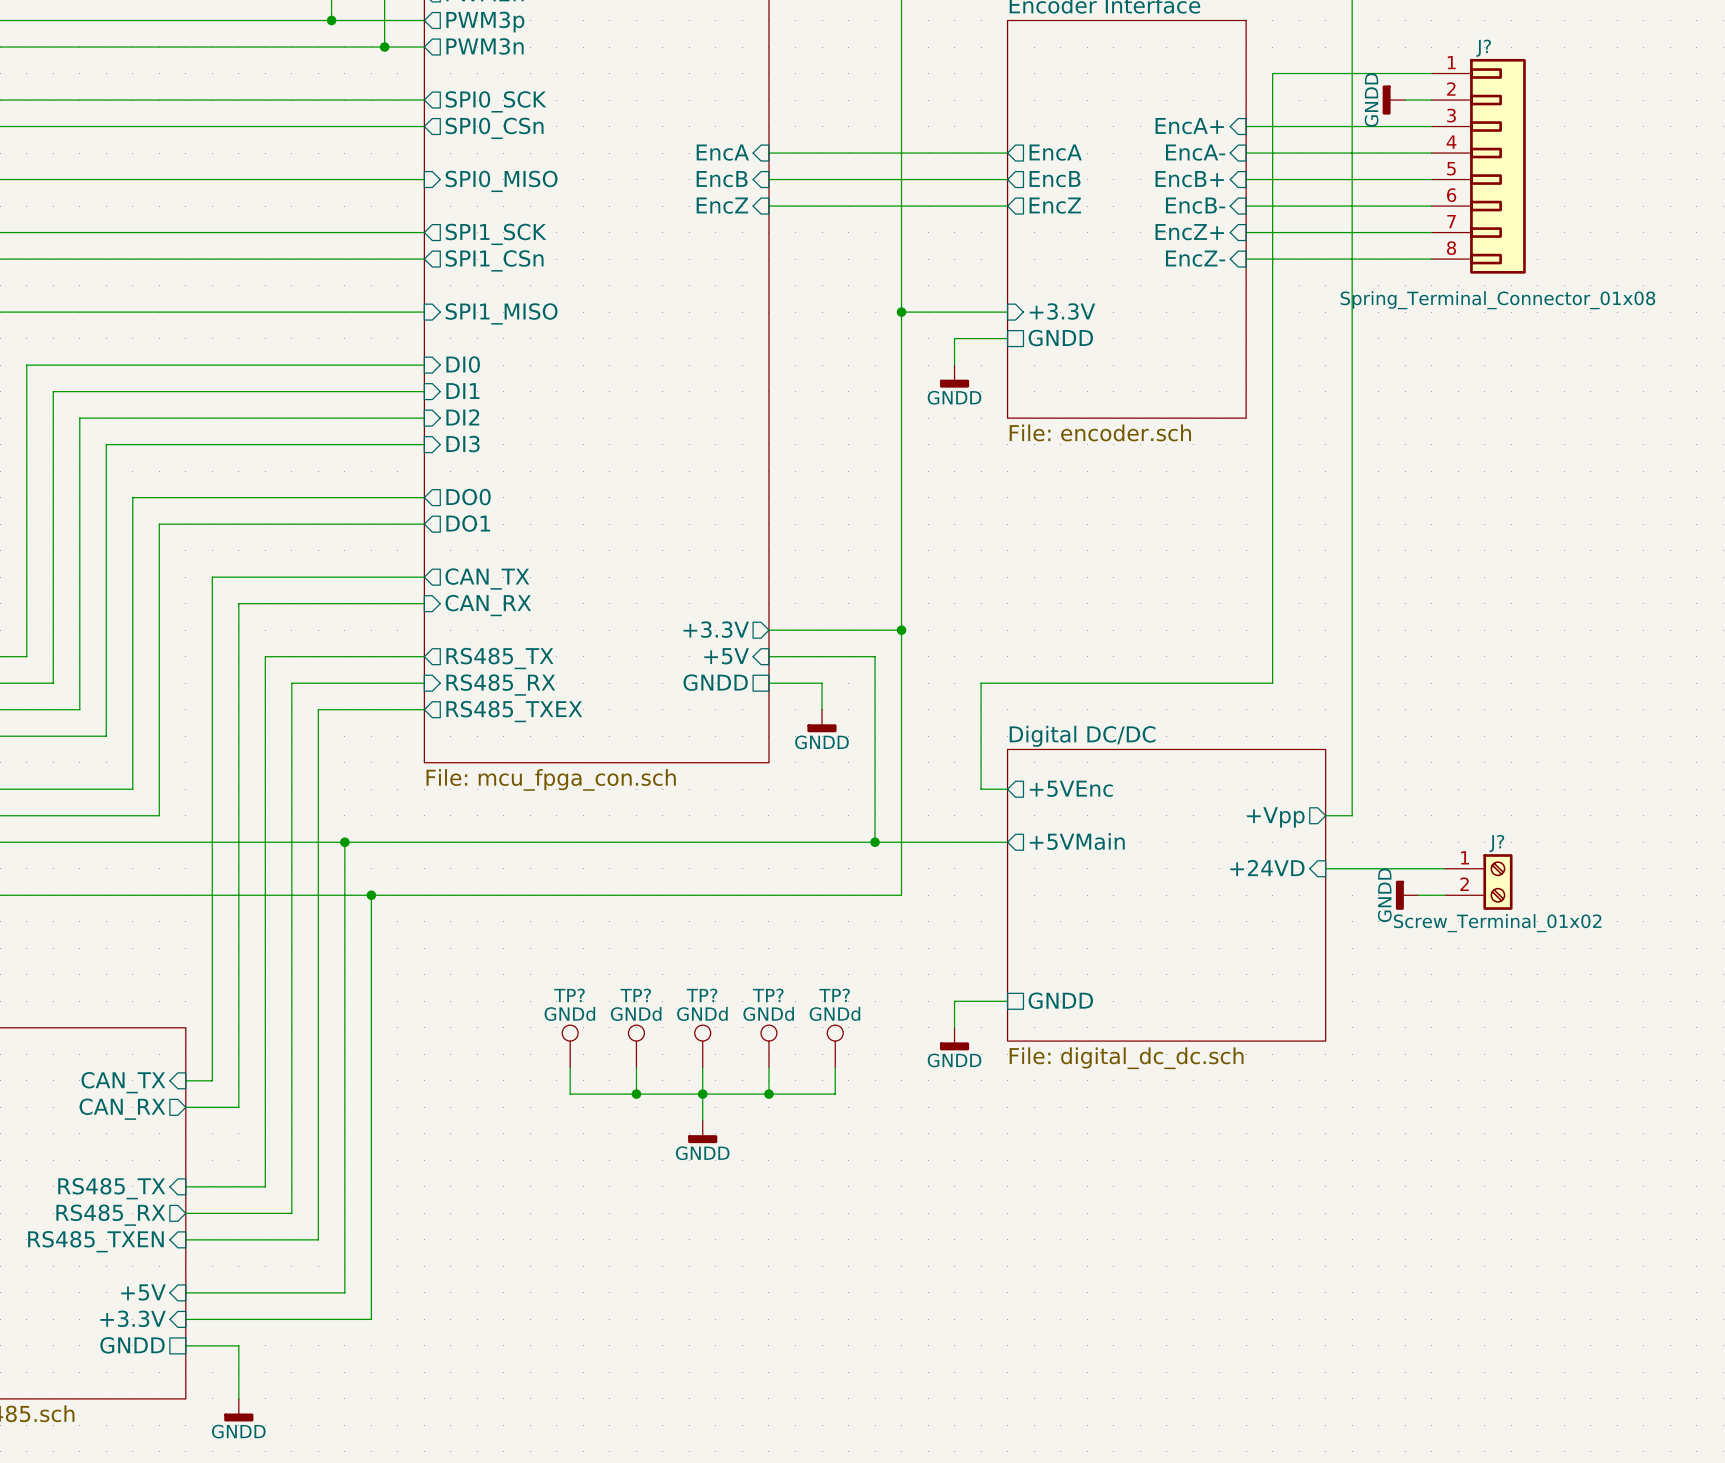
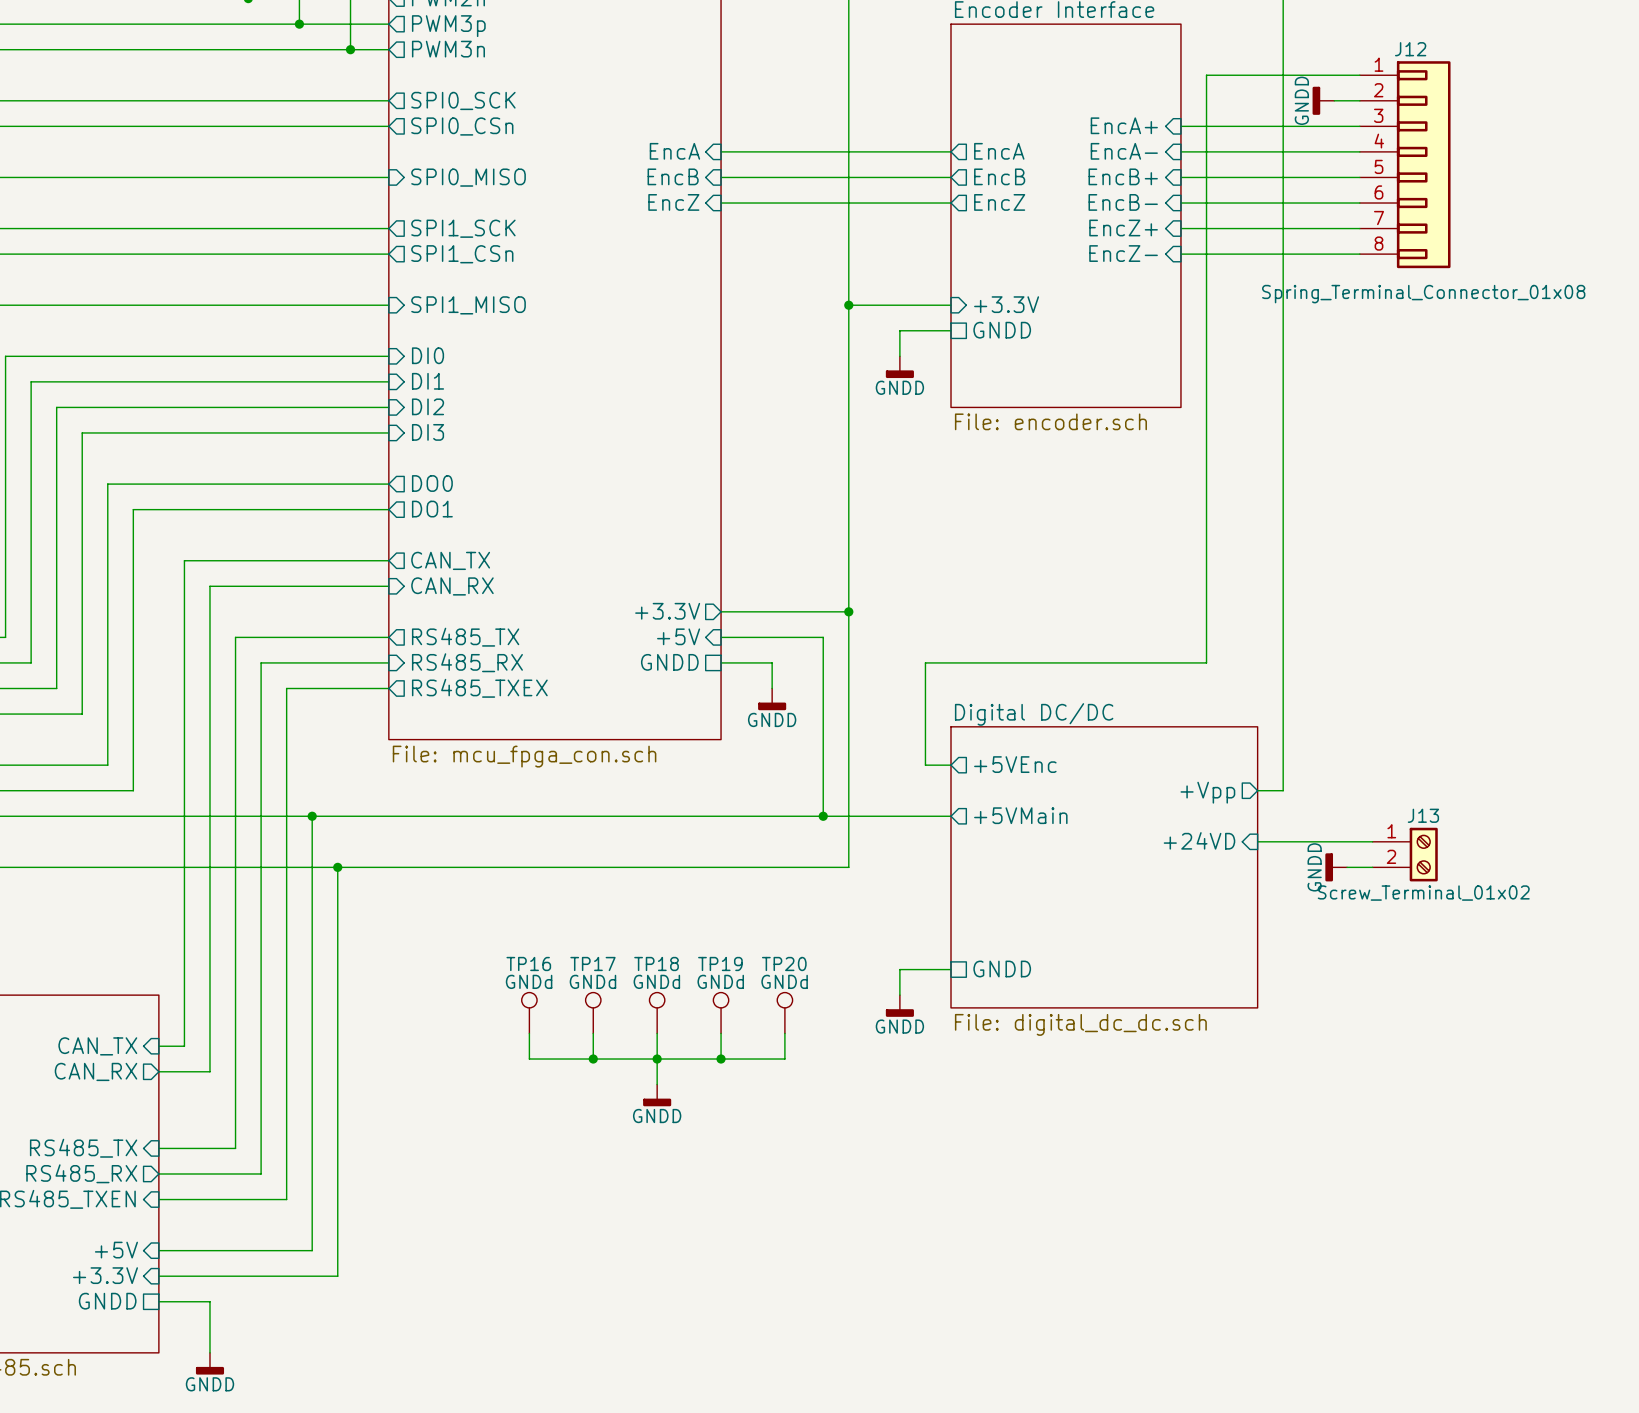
J? name: J? (1483, 48) -> J12 (1410, 49)
J? name: J? (1496, 843) -> J13 (1423, 815)
TP? name: TP? (569, 995) -> TP16 (528, 963)
TP? name: TP? (635, 995) -> TP17 (592, 963)
TP? name: TP? (702, 995) -> TP18 (656, 963)
TP? name: TP? (768, 995) -> TP19 (720, 963)
TP? name: TP? (834, 995) -> TP20 (784, 963)

